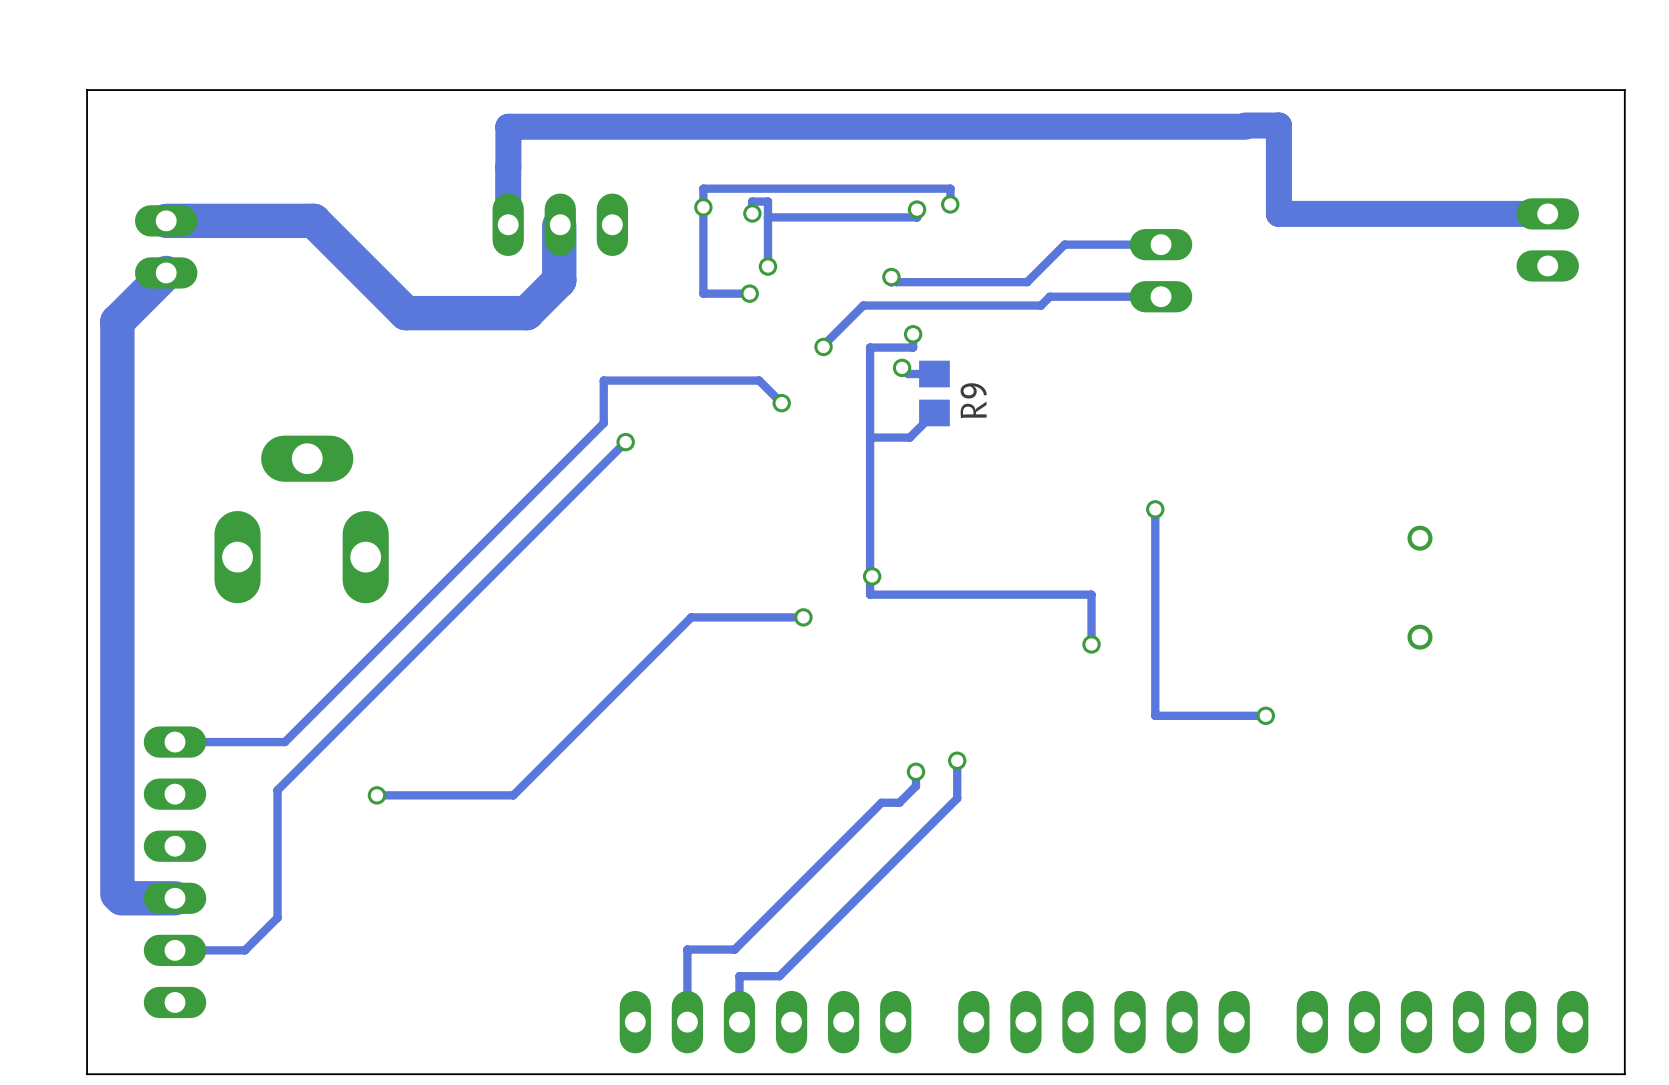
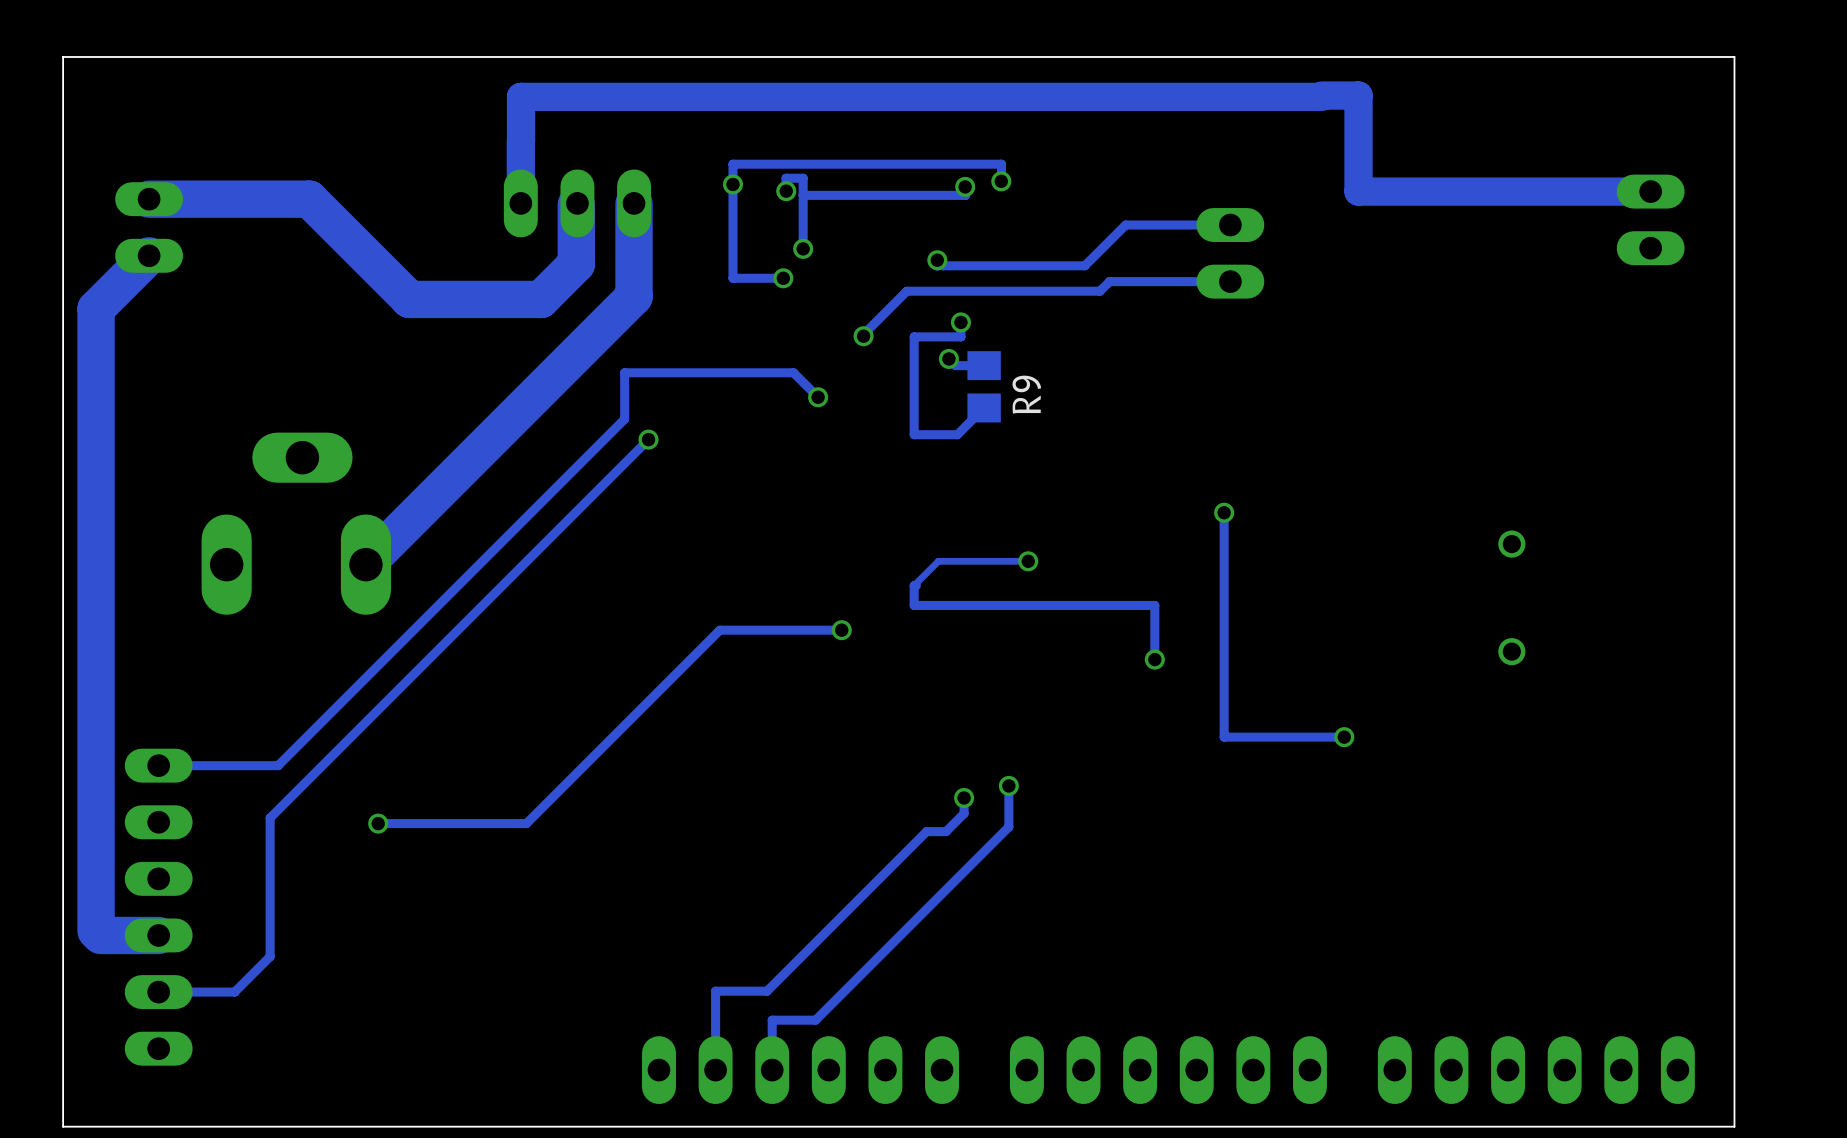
track: none -> (634, 203) (634, 296) (365, 564)
track: (870, 437) (870, 576) -> (1028, 561) (938, 561) (914, 585)
via position: (872, 576) -> (1028, 561)

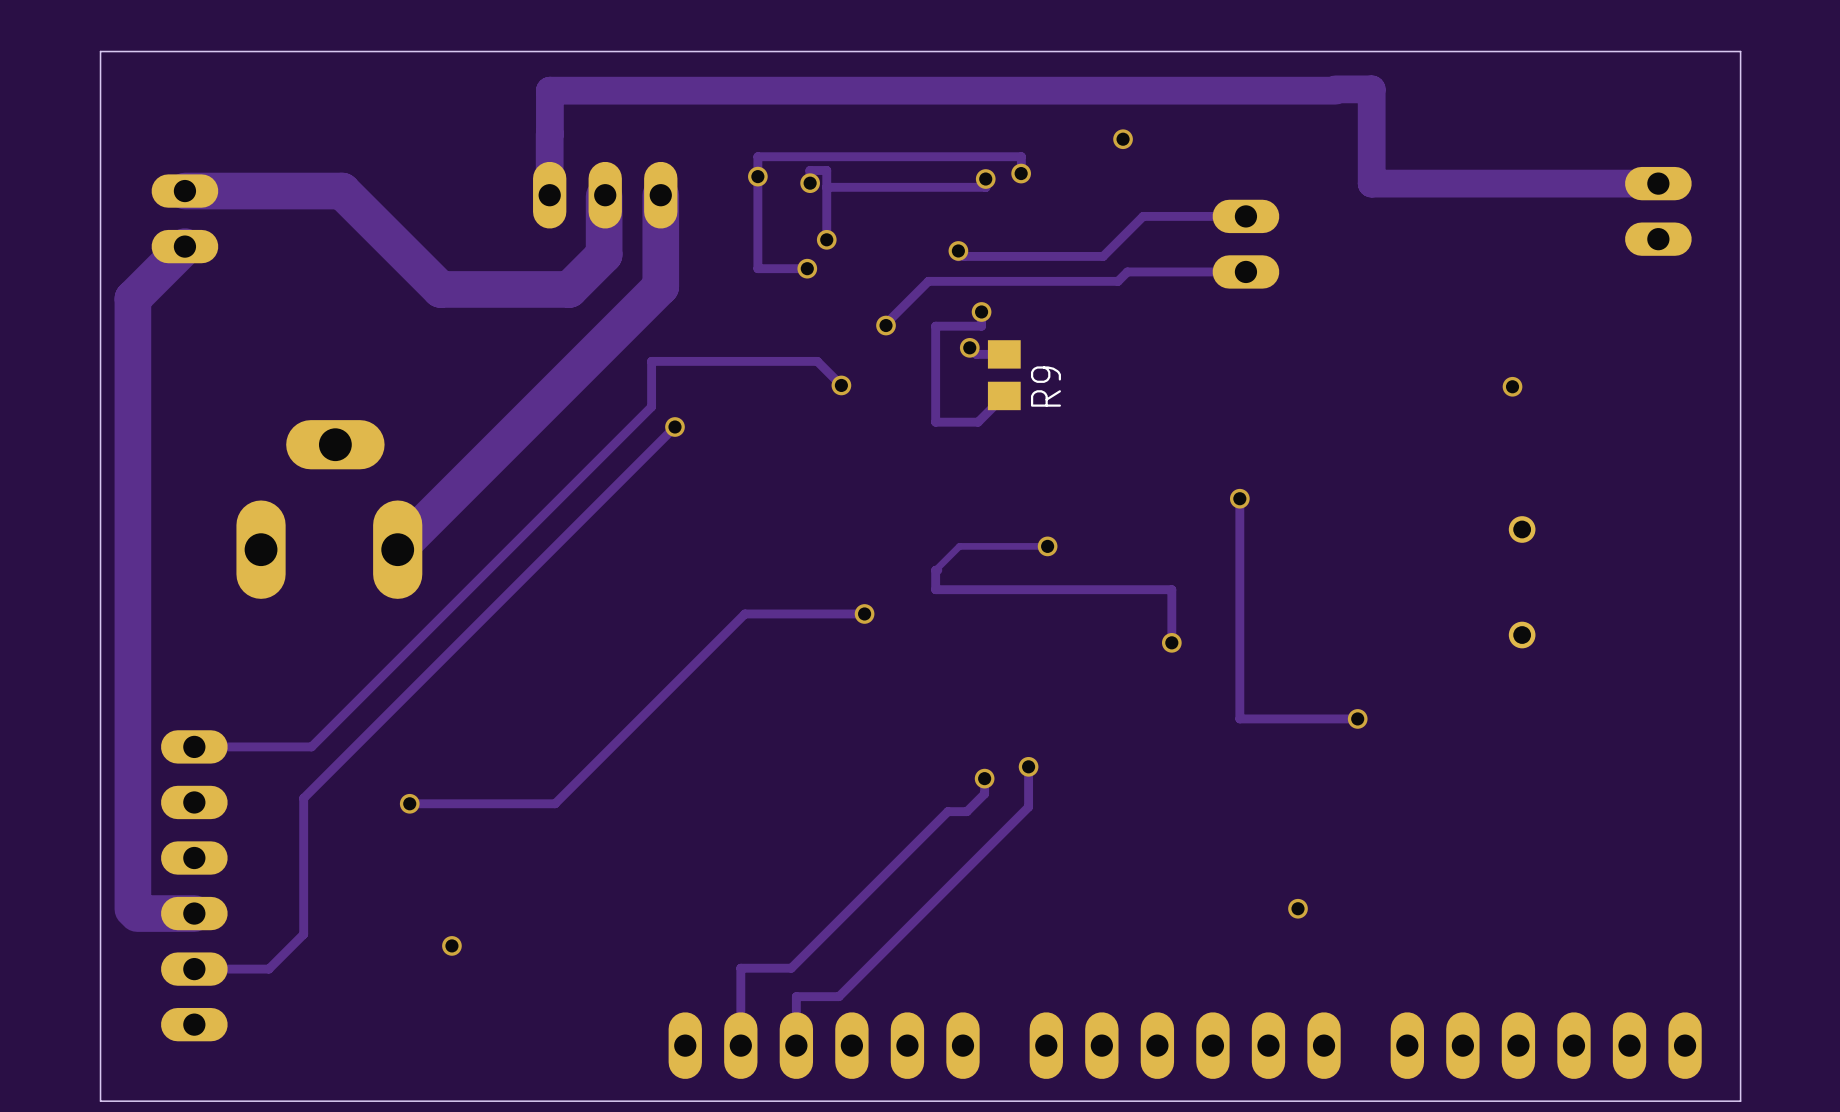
via: none -> (1123, 139)
via: none -> (1512, 386)
via: none -> (1298, 908)
via: none -> (451, 945)

